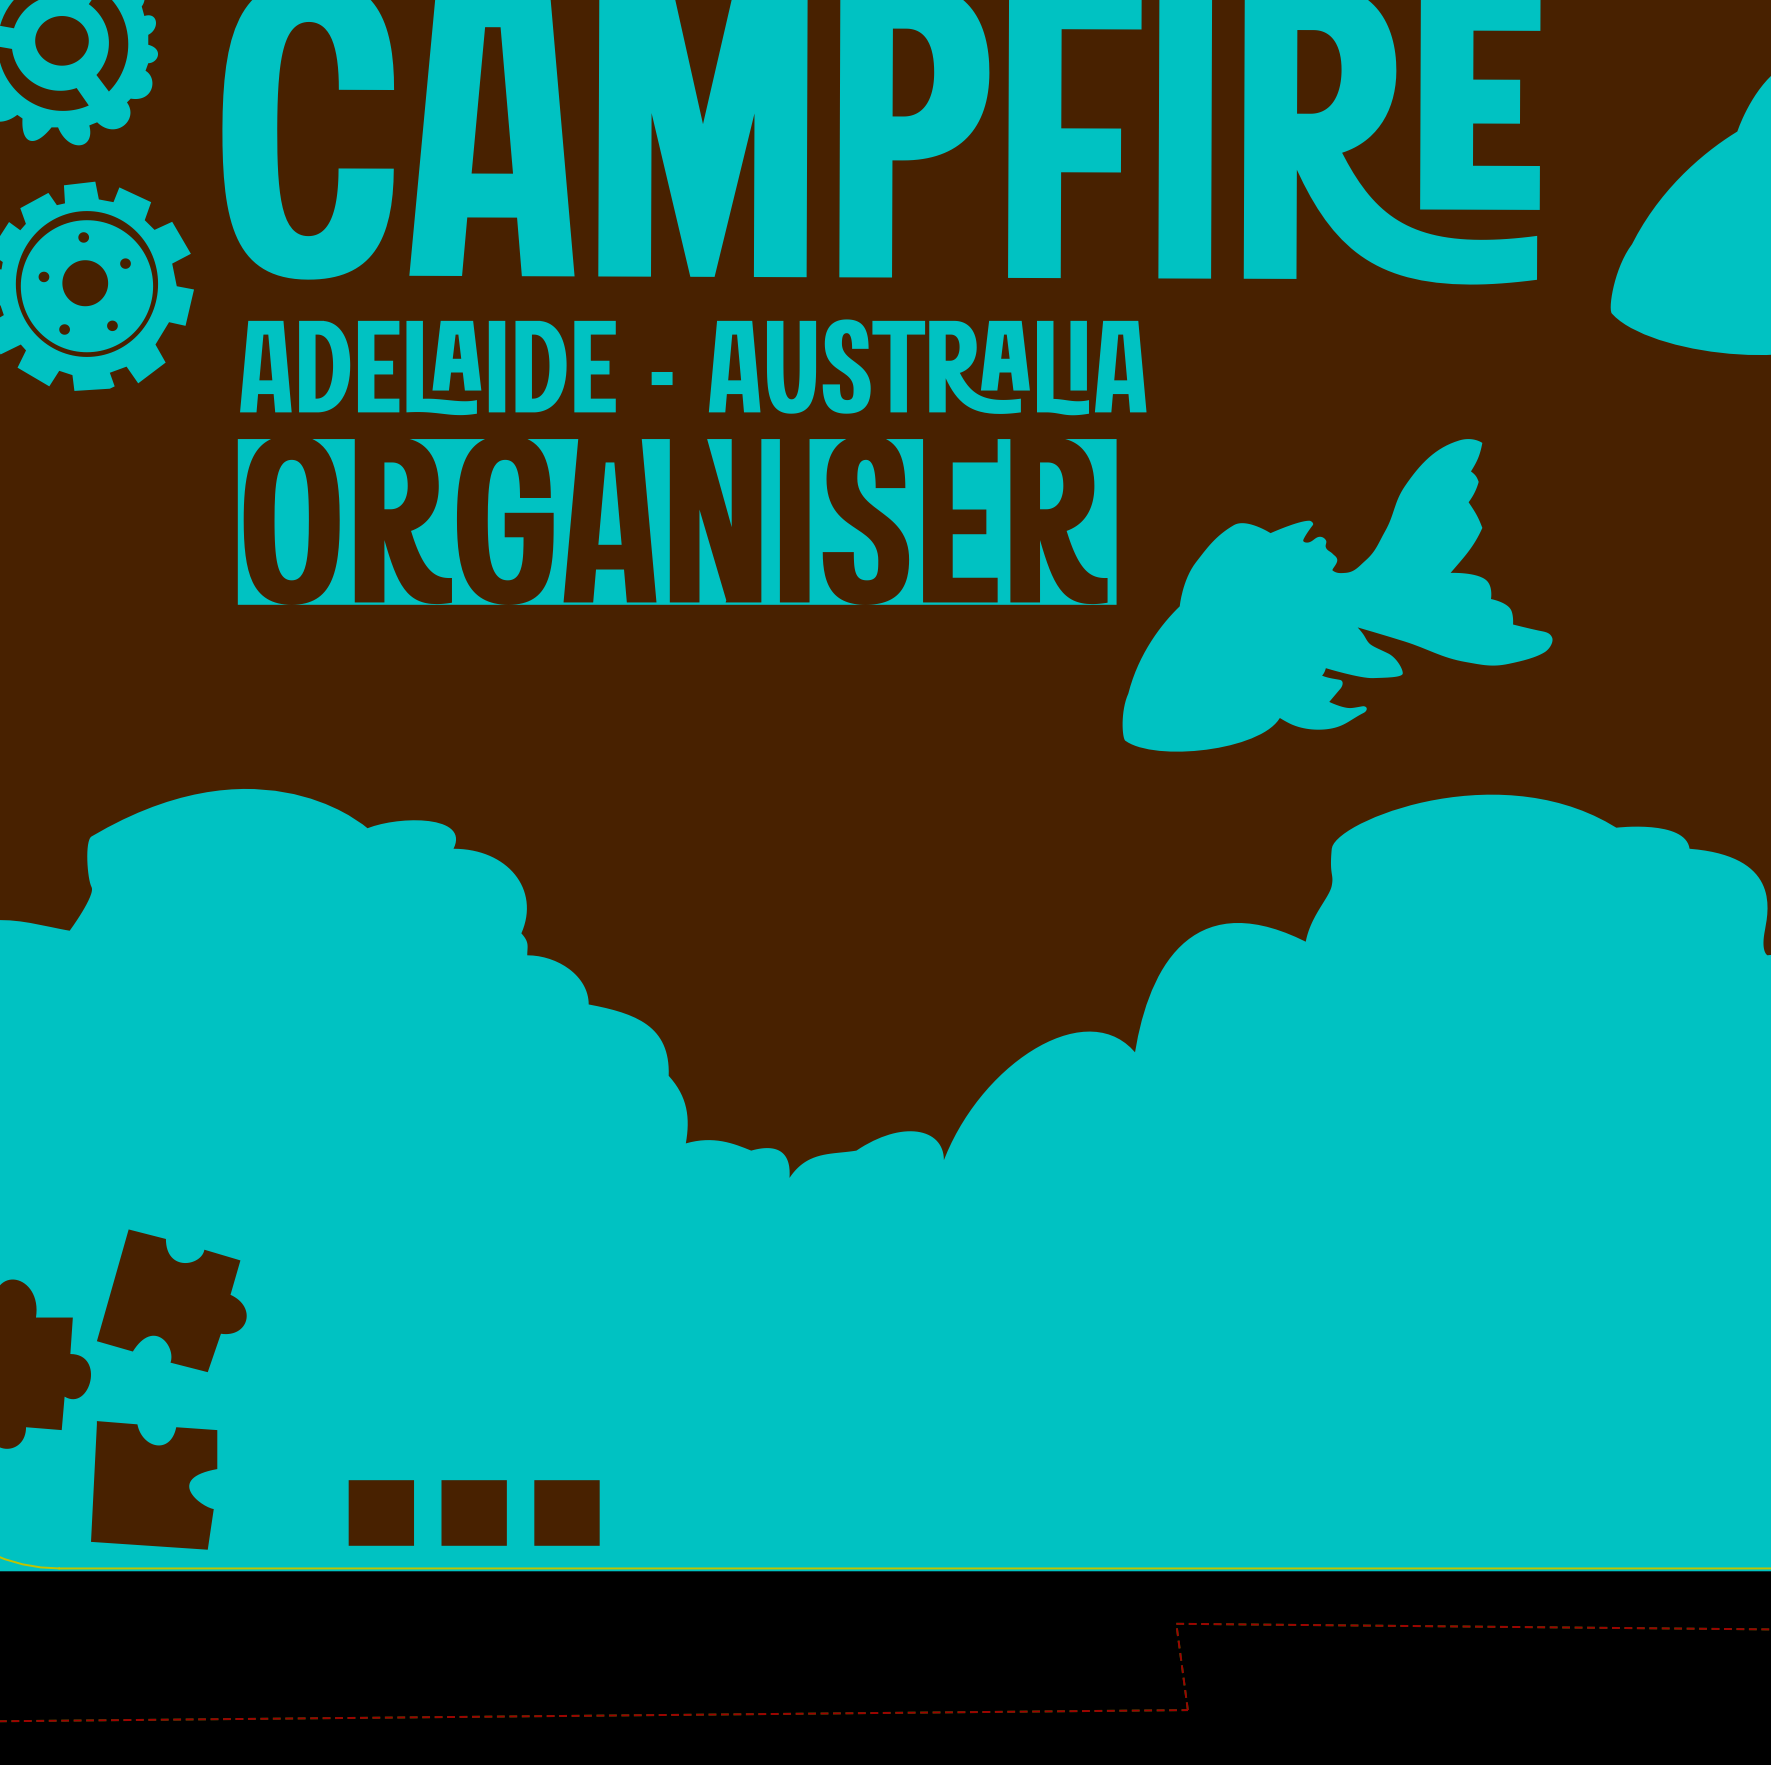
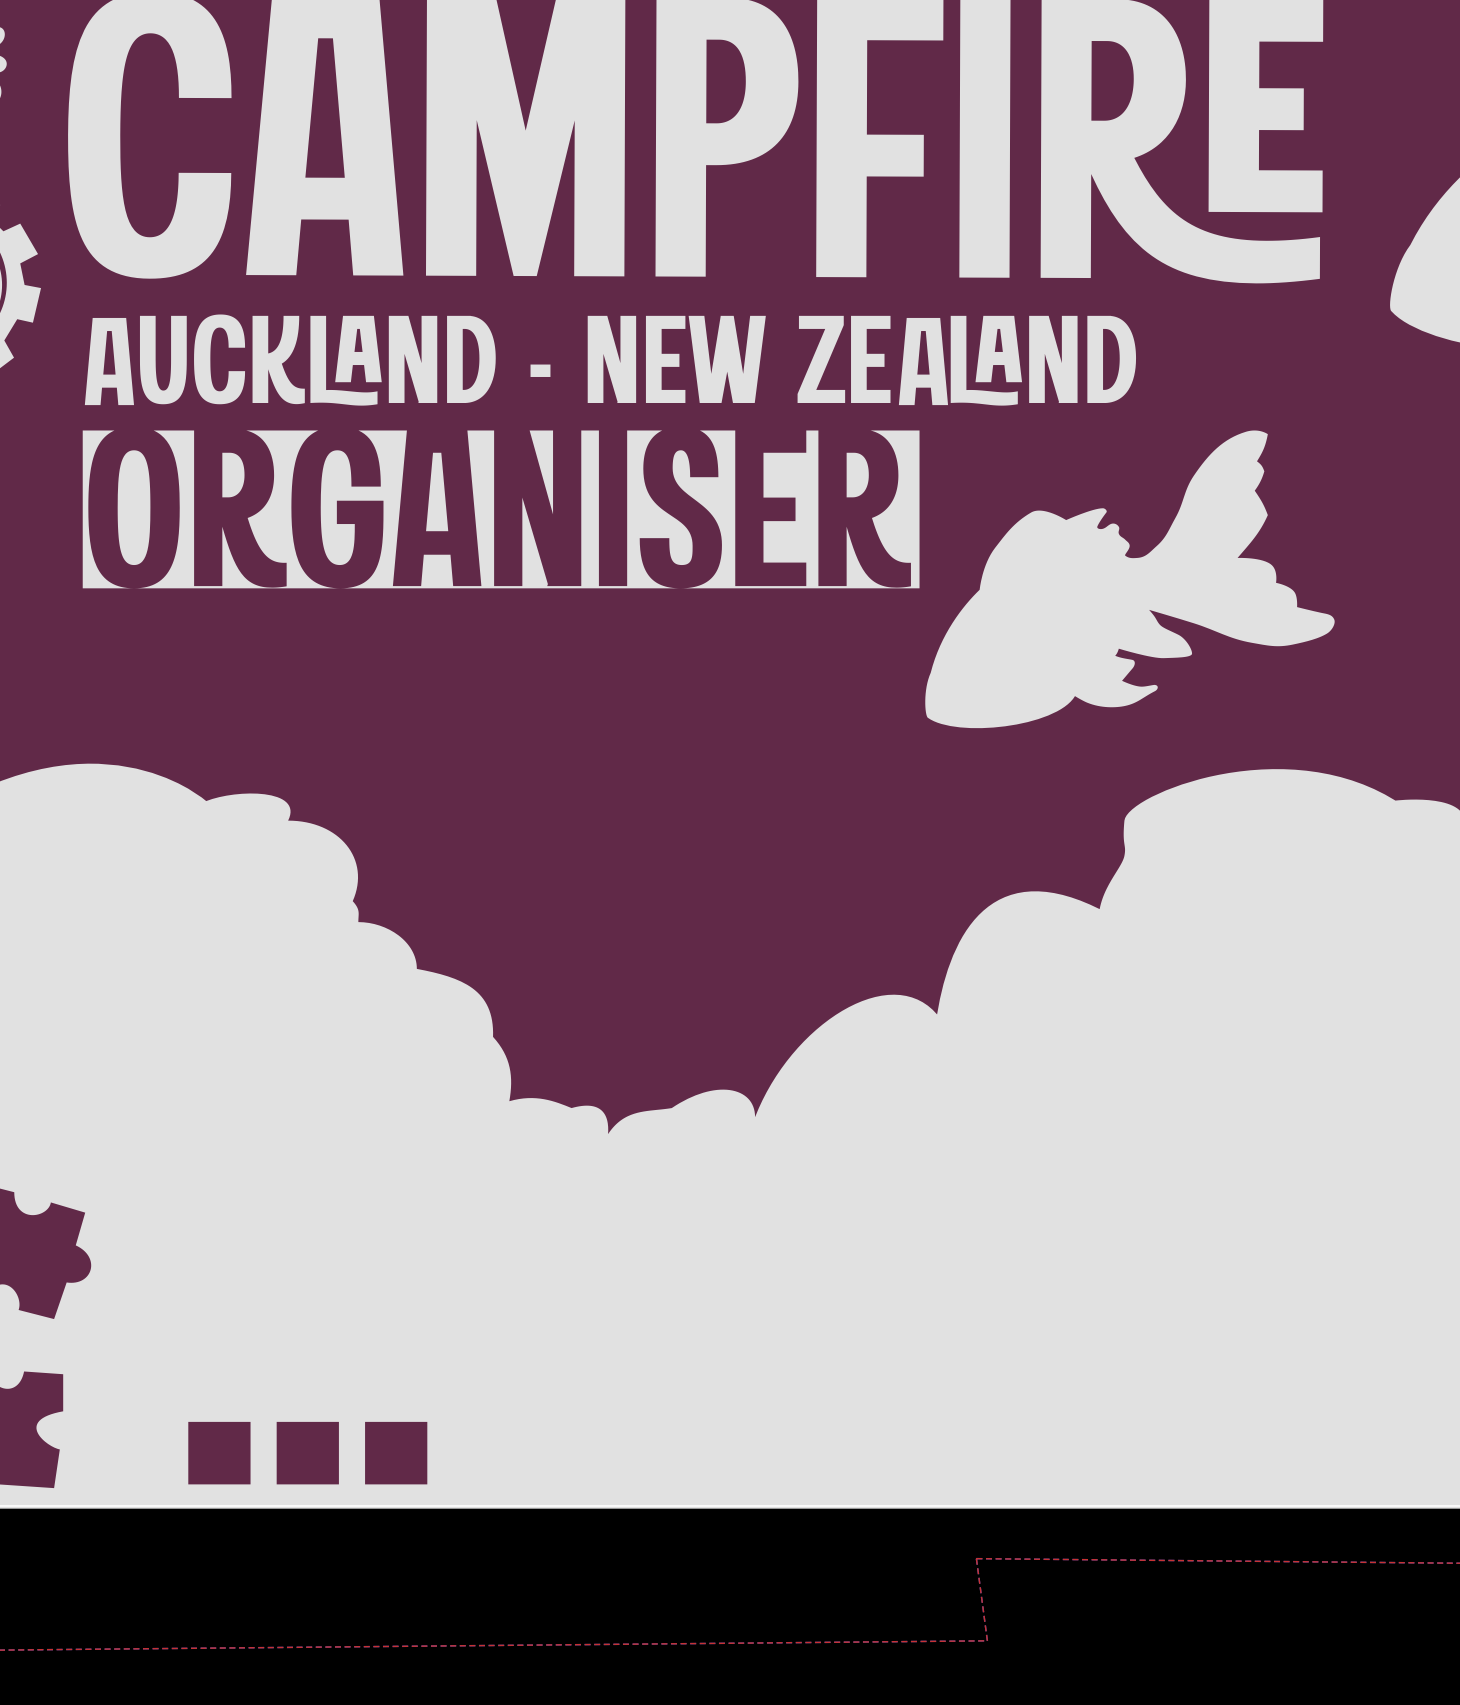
drawing: none -> [252, 315, 305, 405]
drawing: none -> [587, 315, 637, 404]
drawing: none -> [797, 315, 846, 404]
drawing: none -> [950, 315, 1137, 406]
drawing shape: [822, 319, 871, 414] -> [645, 315, 686, 404]
drawing: [299, 320, 351, 413] -> none
drawing shape: [357, 320, 400, 413] -> [194, 314, 246, 405]
drawing: [488, 320, 506, 413] -> none
drawing shape: [574, 320, 616, 413] -> [388, 315, 438, 404]
drawing: [708, 320, 761, 413] -> none
drawing shape: [872, 320, 926, 413] -> [688, 315, 766, 404]
drawing: [929, 320, 1021, 414] -> none
drawing shape: [1036, 320, 1090, 416] -> [851, 315, 891, 404]
drawing: [1070, 320, 1087, 391] -> none
drawing position: (456, 355) -> (358, 349)
drawing position: (1005, 355) -> (998, 349)
drawing position: (541, 366) -> (471, 359)
drawing position: (441, 367) -> (343, 360)
drawing position: (791, 367) -> (163, 360)
drawing position: (662, 378) -> (540, 370)

